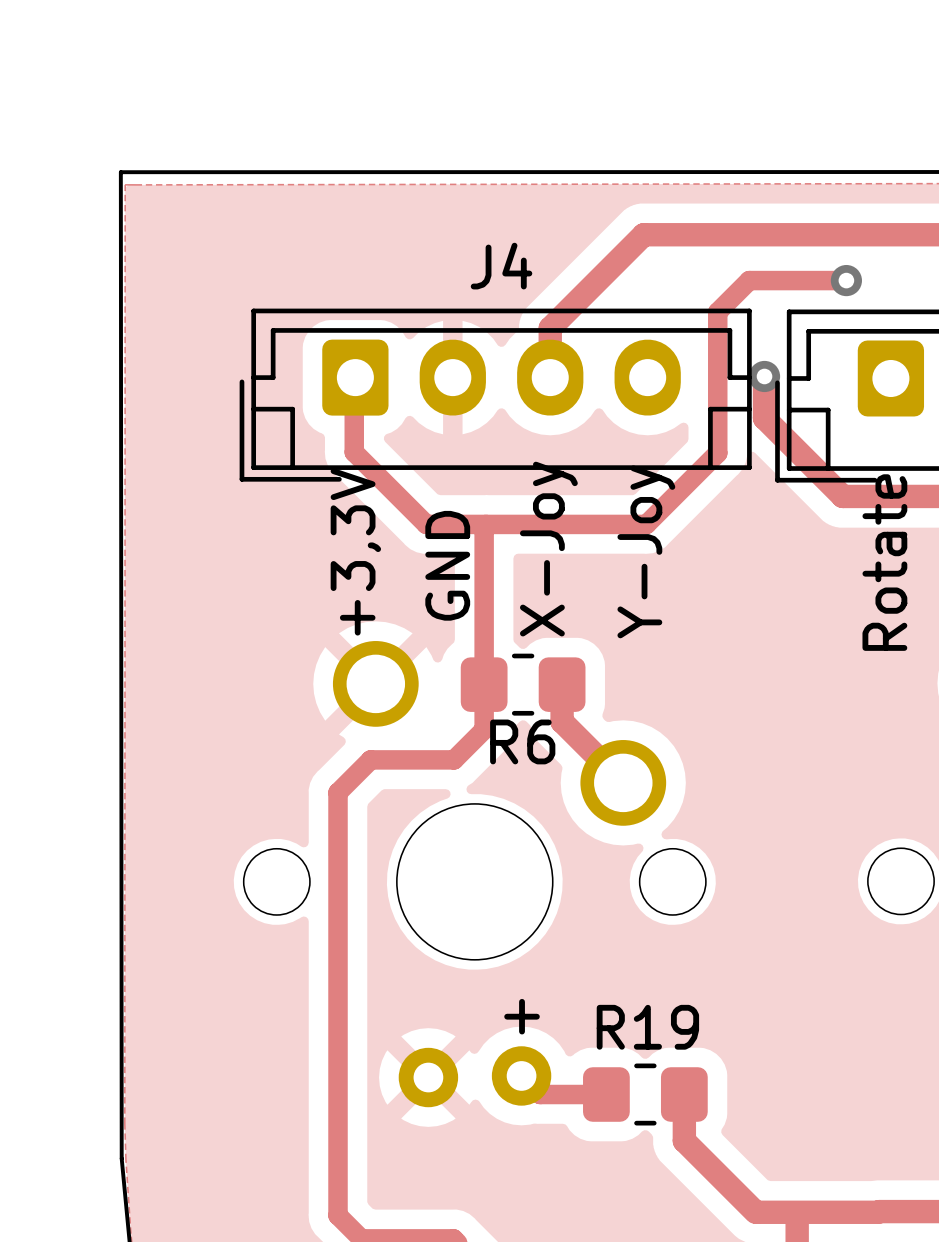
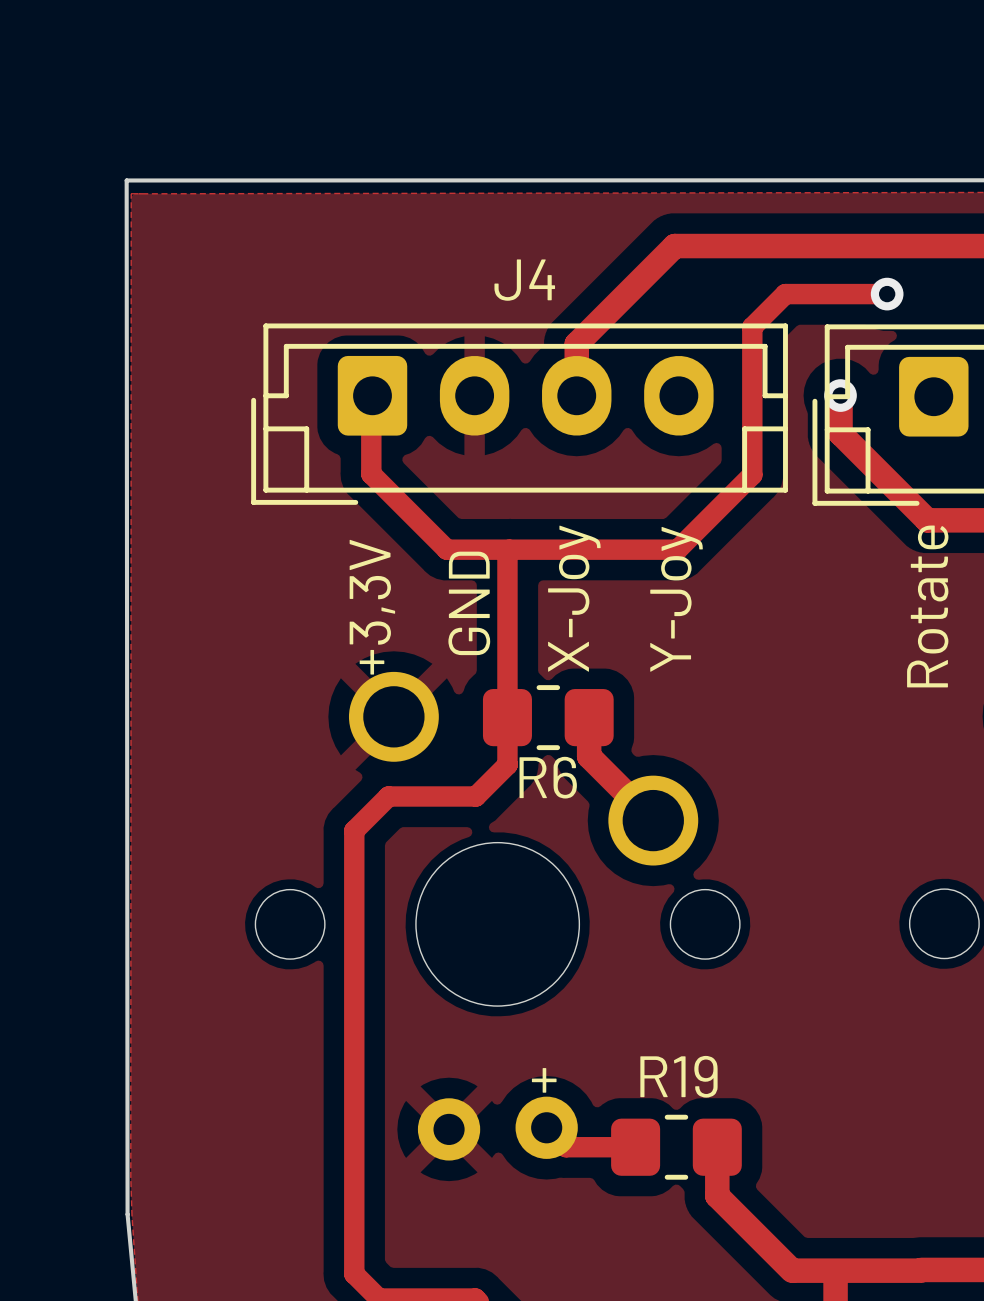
track: (764, 376) (764, 418) (842, 496) (884, 496) -> (840, 395) (840, 433) (927, 520)
via position: (764, 376) -> (840, 395)

